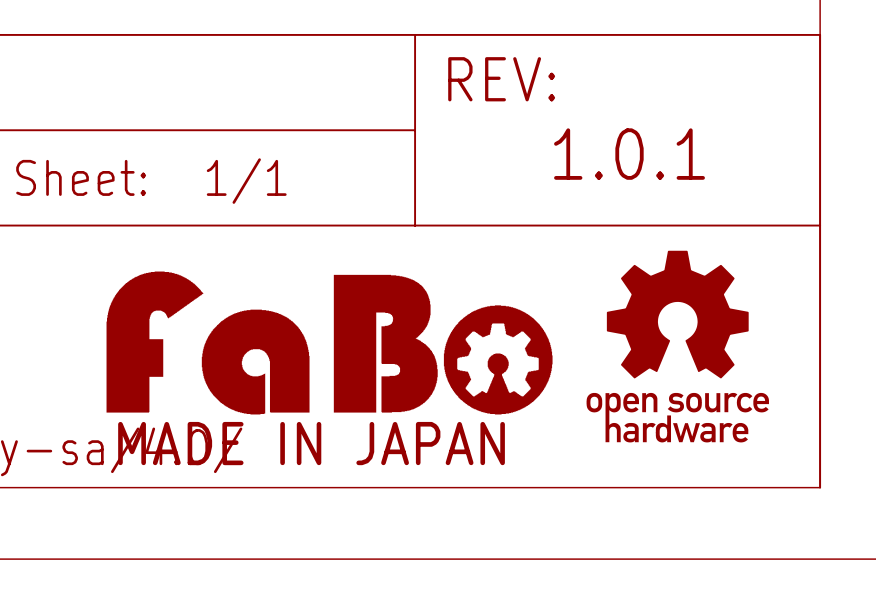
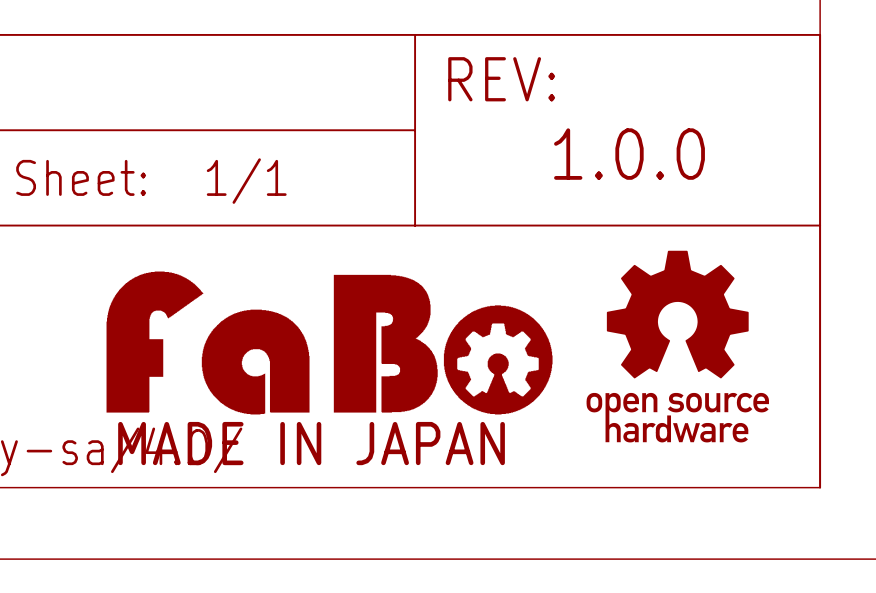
text: 1.0.1 (629, 154) -> 1.0.0 (629, 154)

